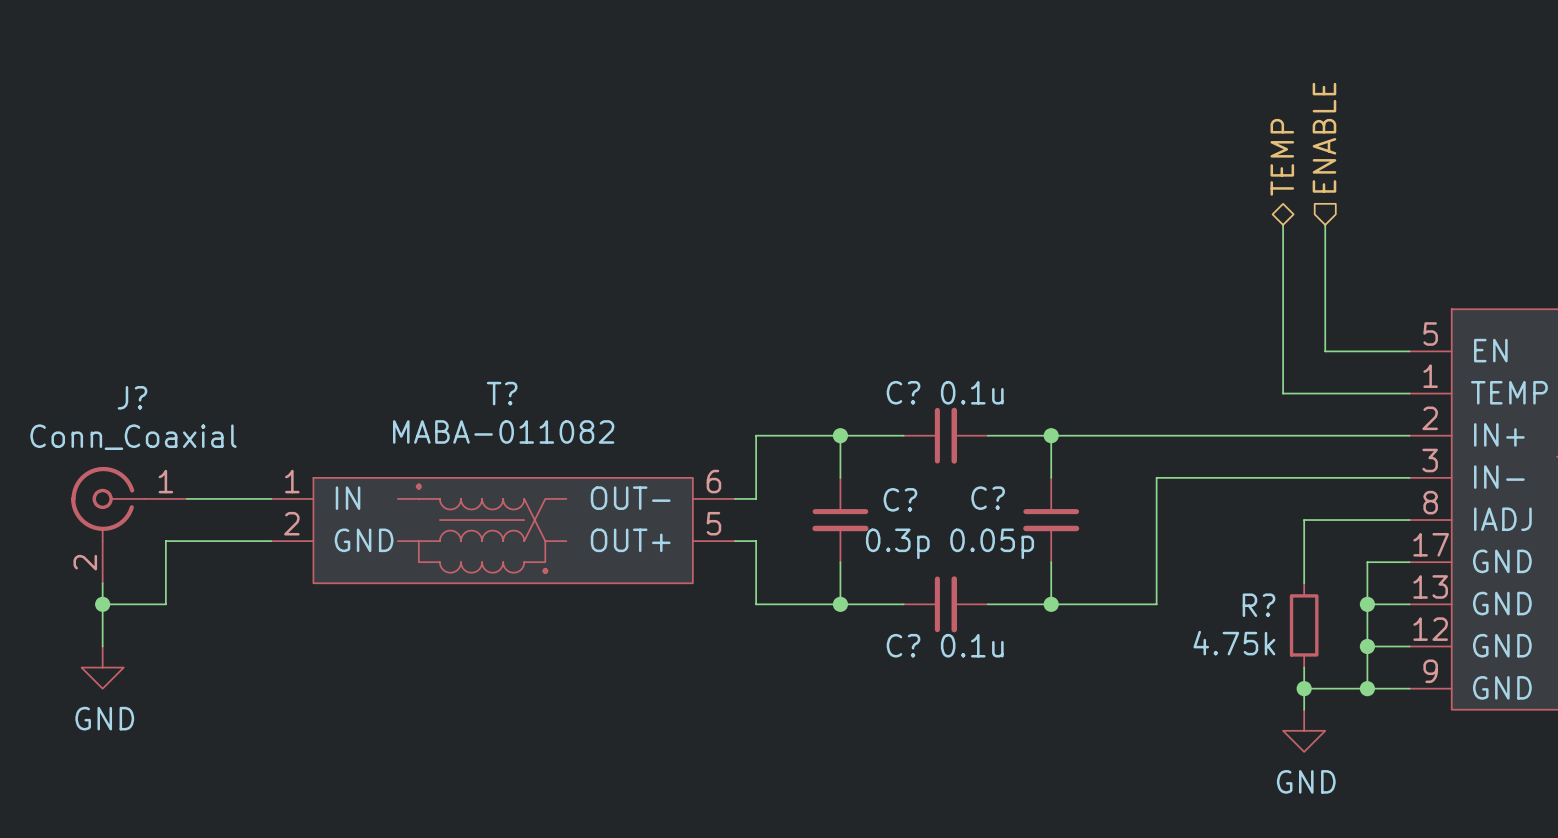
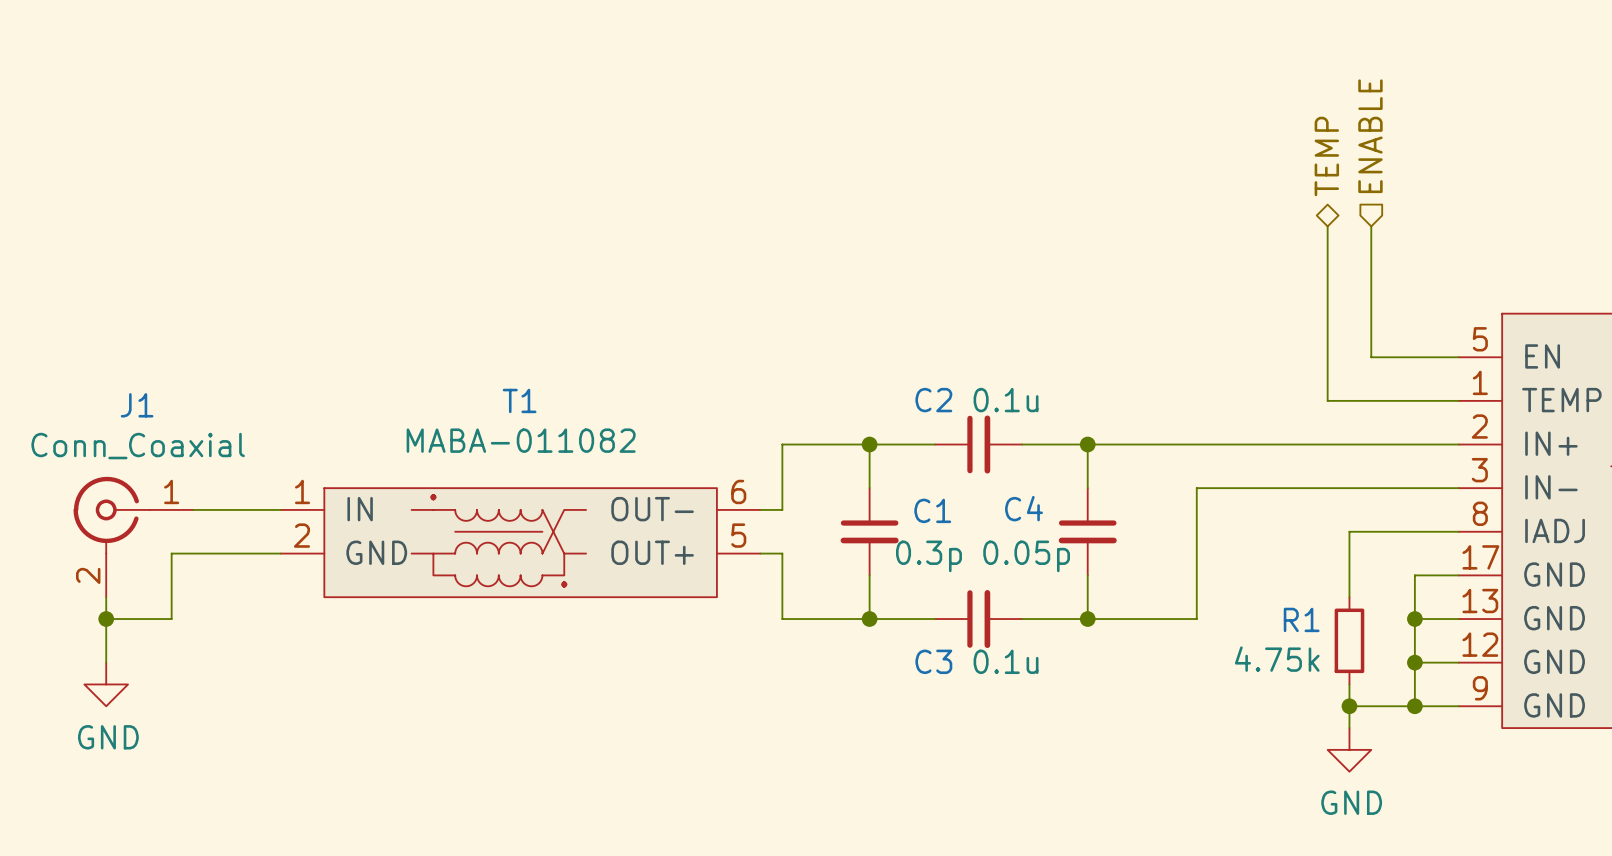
C? name: C? (903, 392) -> C2 (933, 400)
T? name: T? (502, 393) -> T1 (519, 400)
J? name: J? (132, 397) -> J1 (137, 405)
C? name: C? (988, 498) -> C4 (1024, 508)
C? name: C? (900, 499) -> C1 (932, 510)
R? name: R? (1258, 605) -> R1 (1301, 619)
C? name: C? (903, 645) -> C3 (933, 661)

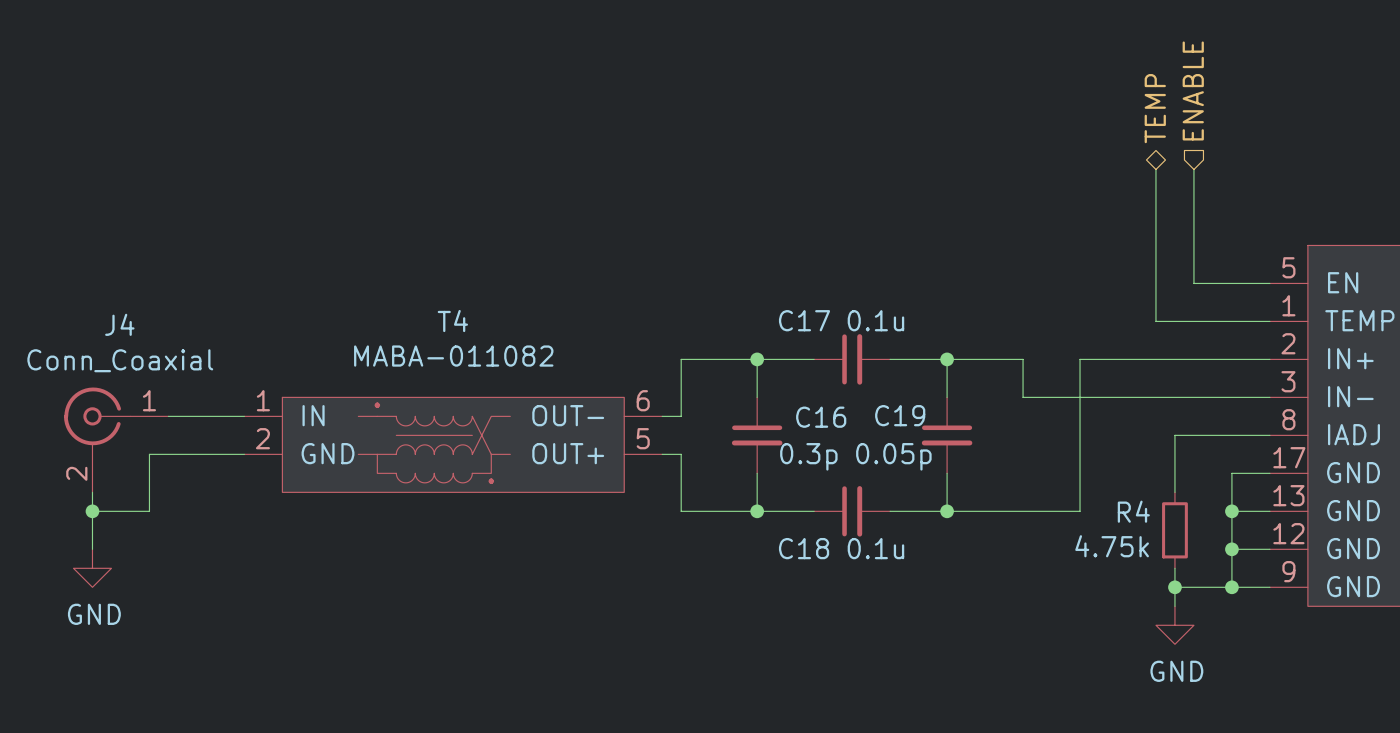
T1 name: T1 (519, 400) -> T4 (452, 321)
C2 name: C2 (933, 400) -> C17 (804, 320)
J1 name: J1 (137, 405) -> J4 (119, 324)
wire: (1174, 444) (1240, 444) -> (1023, 359) (1023, 397) (1042, 397)
wire: (1196, 488) (1196, 619) -> (1080, 359) (1080, 511) (1042, 511)
C4 name: C4 (1024, 508) -> C19 (900, 415)
C1 name: C1 (932, 510) -> C16 (821, 417)
R1 name: R1 (1301, 619) -> R4 (1133, 511)
C3 name: C3 (933, 661) -> C18 (804, 548)

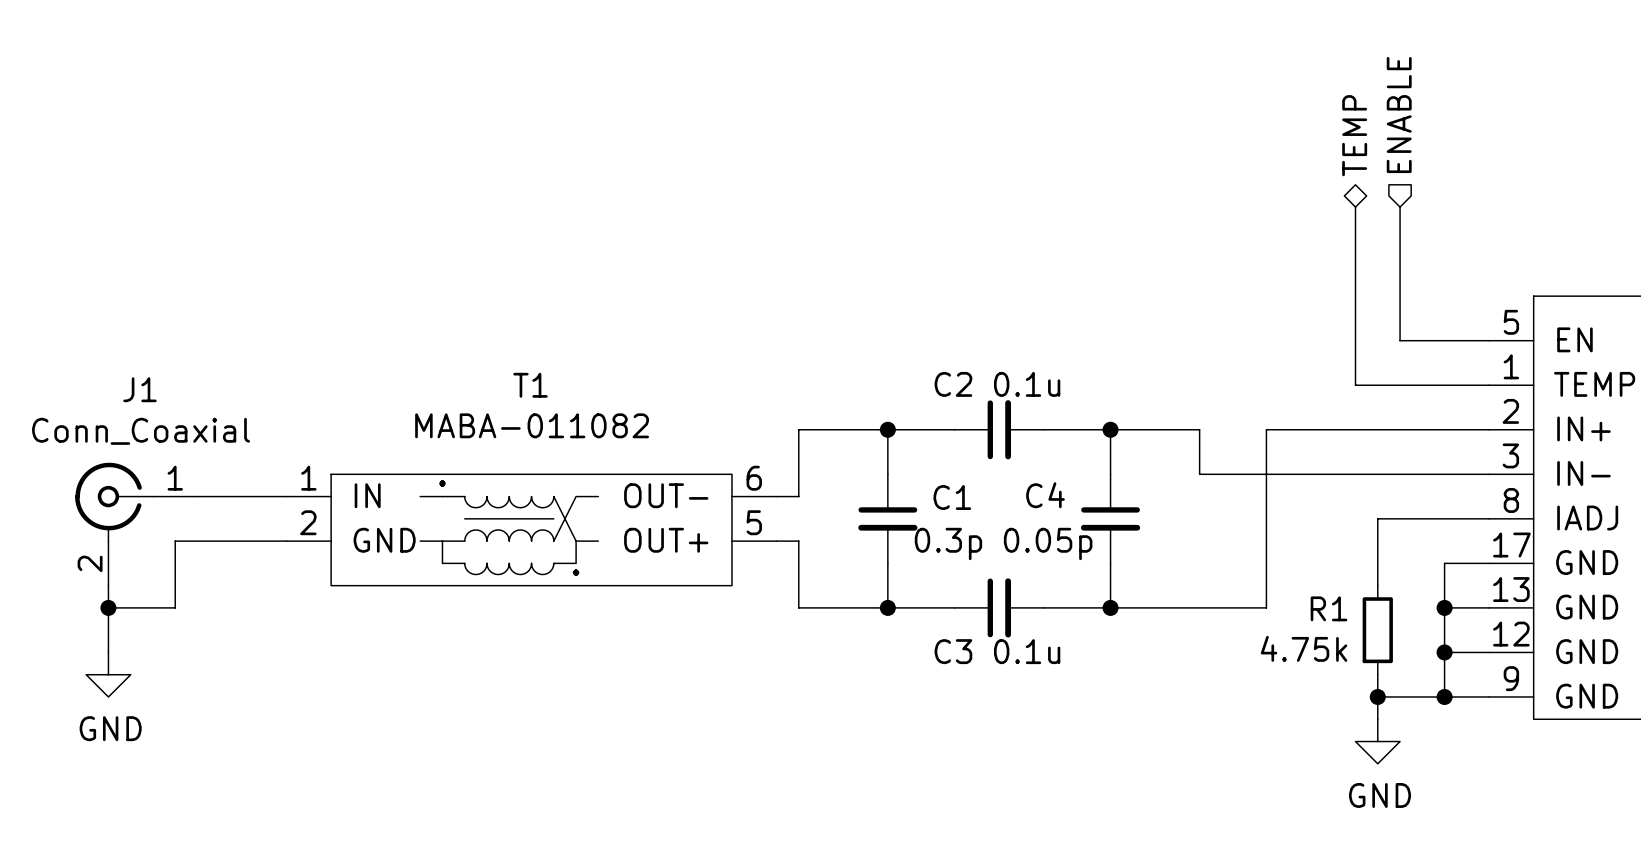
C17 name: C17 (804, 320) -> C2 (953, 384)
T4 name: T4 (452, 321) -> T1 (530, 385)
J4 name: J4 (119, 324) -> J1 (139, 389)
C19 name: C19 (900, 415) -> C4 (1045, 495)
C16 name: C16 (821, 417) -> C1 (952, 497)
R4 name: R4 (1133, 511) -> R1 (1328, 608)
C18 name: C18 (804, 548) -> C3 (953, 651)

